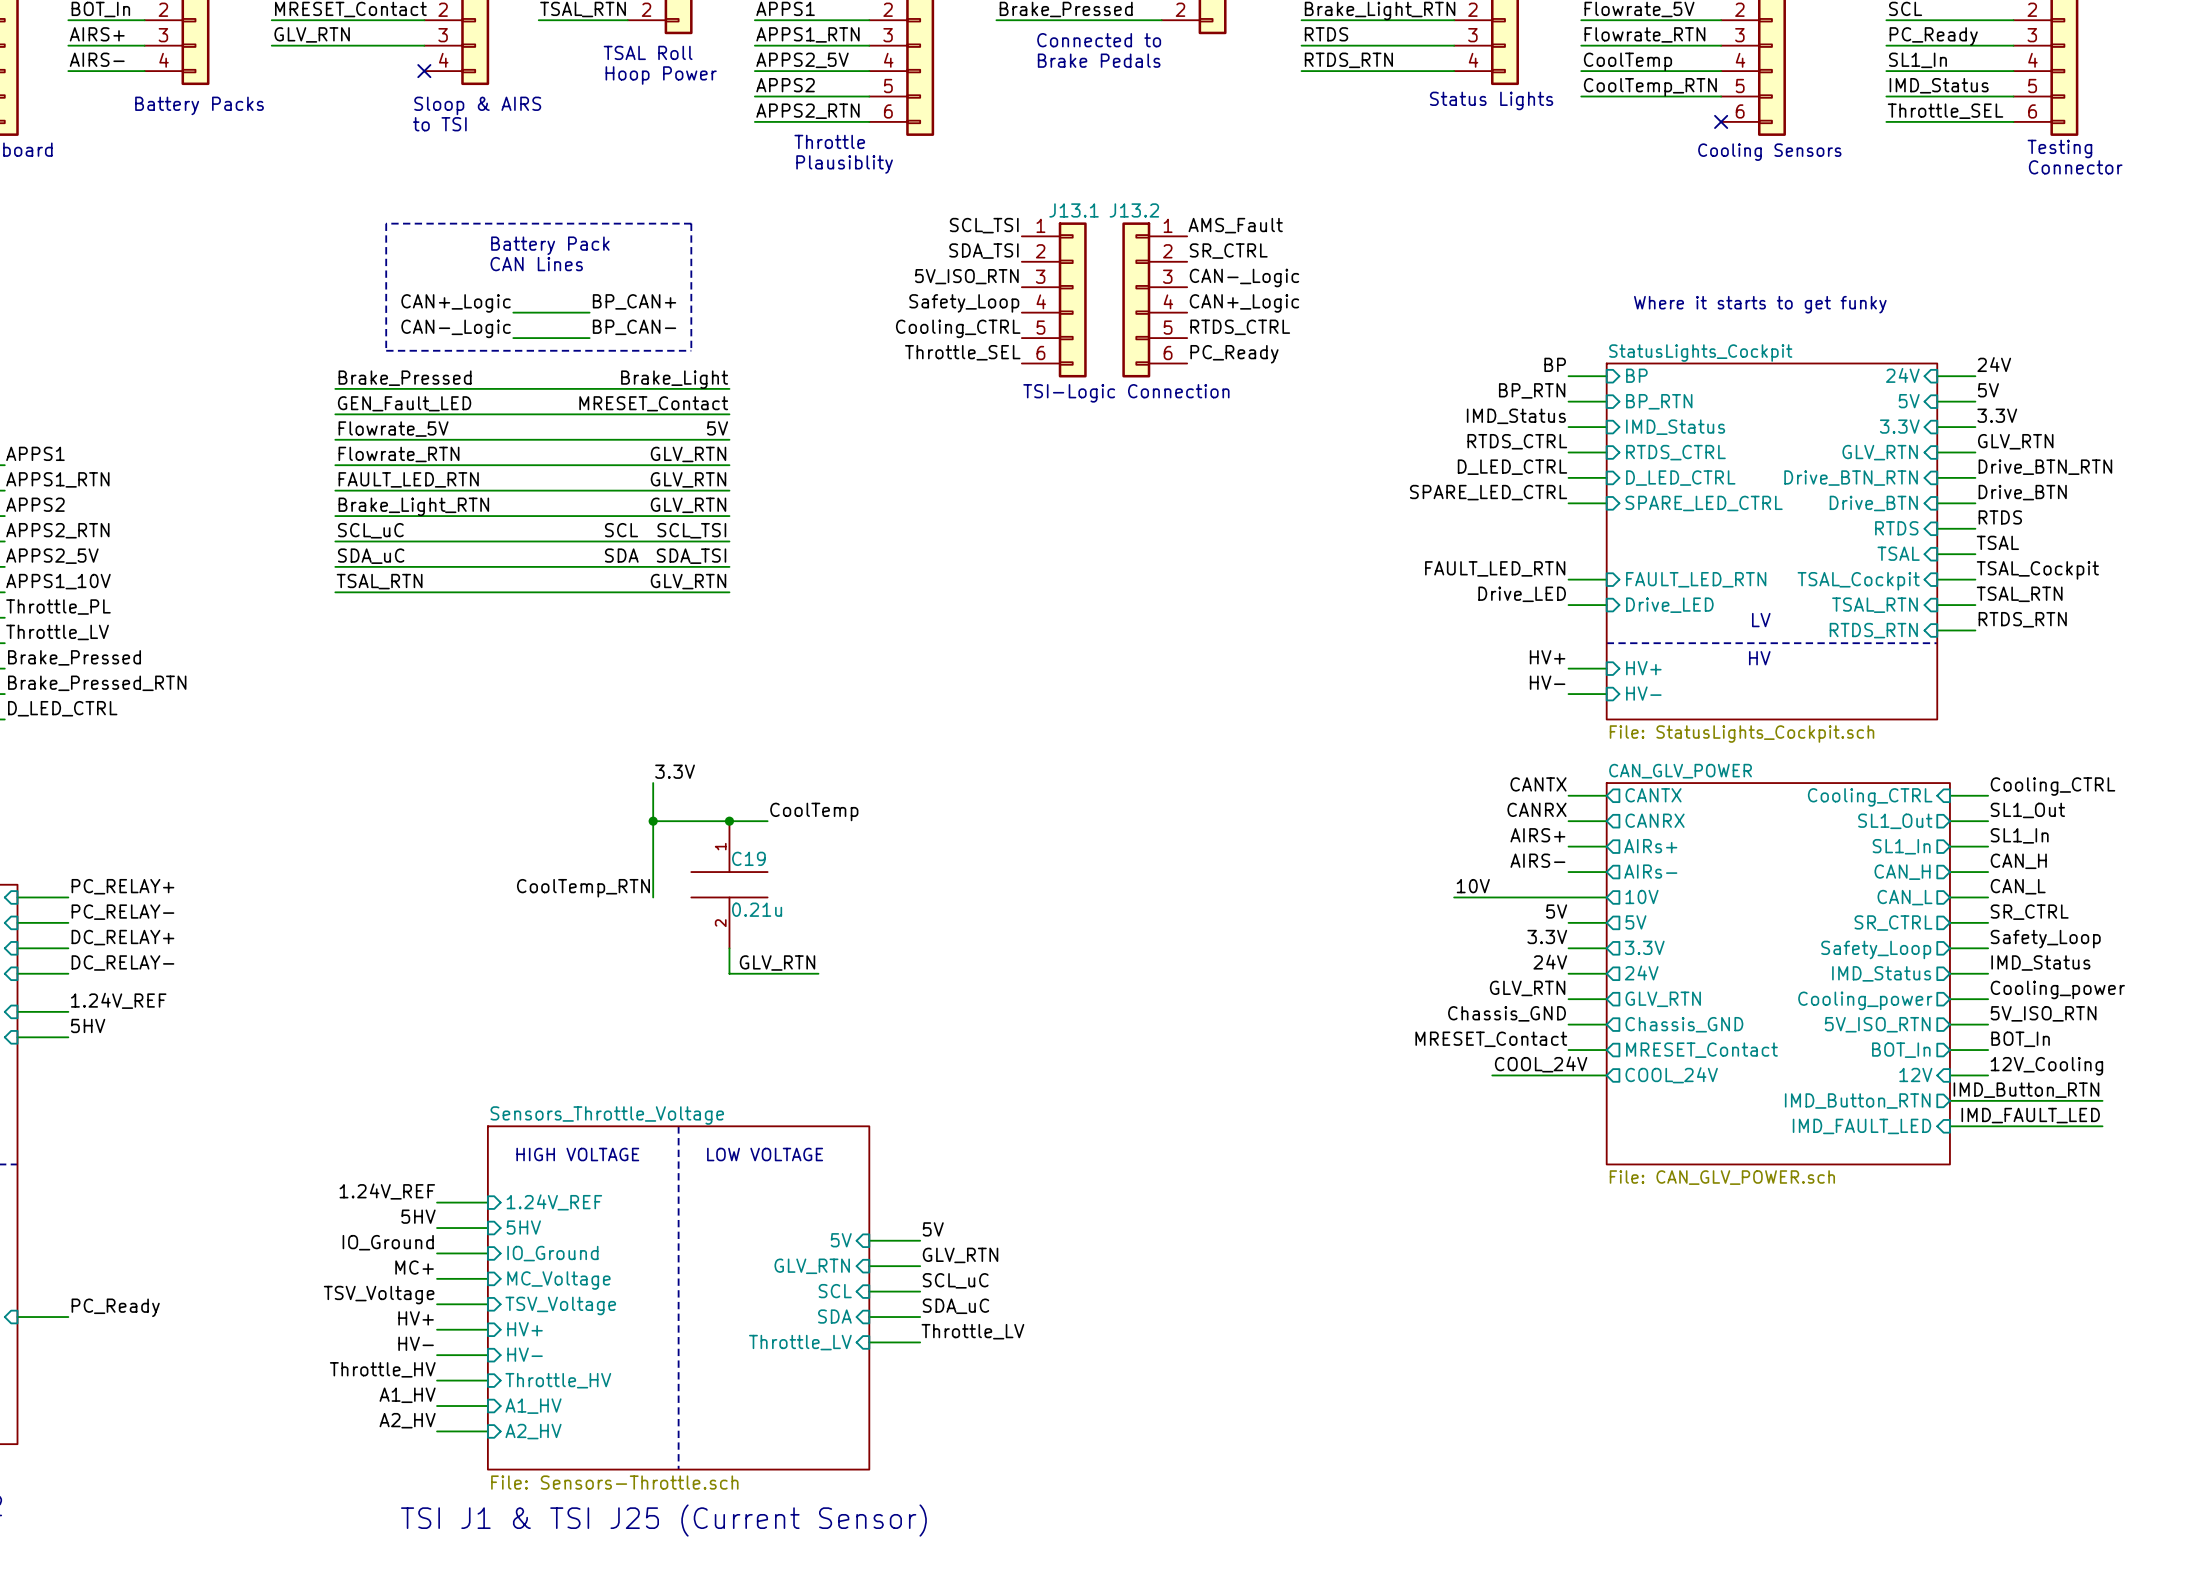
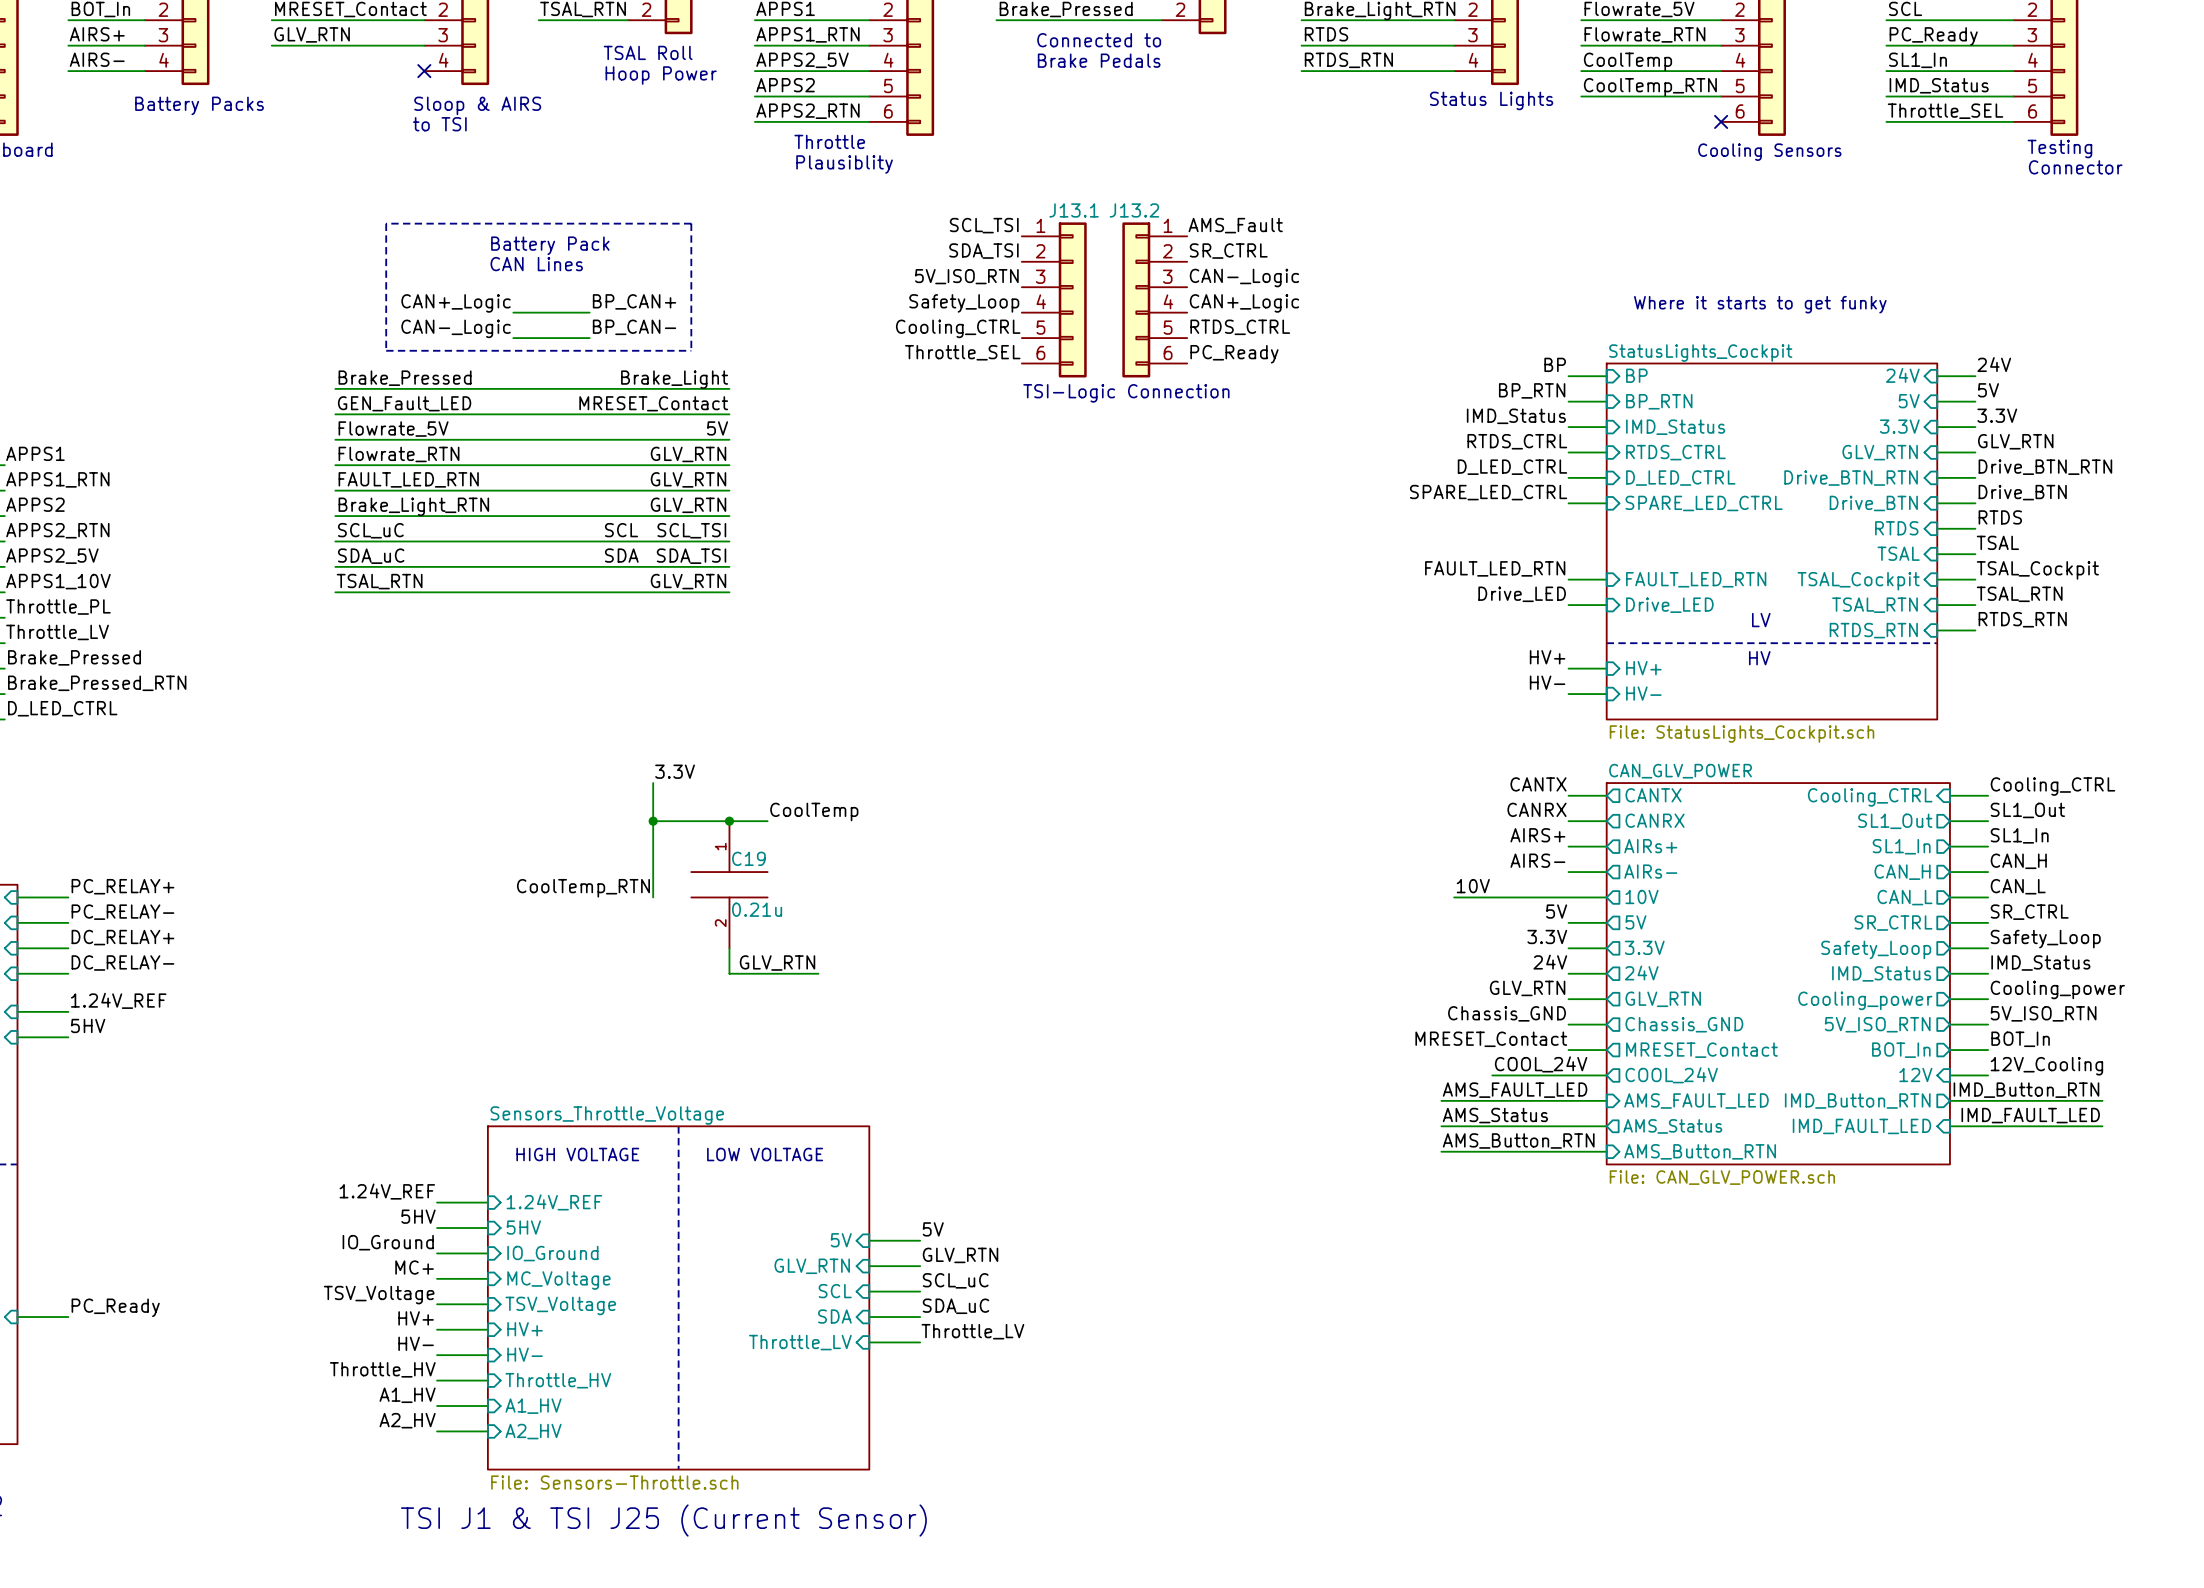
label: none -> AMS_FAULT_LED (1515, 1090)
wire: none -> (1441, 1100) (1606, 1100)
sheet pin: none -> AMS_FAULT_LED (1696, 1101)
label: none -> AMS_Status (1495, 1115)
wire: none -> (1441, 1126) (1606, 1126)
sheet pin: none -> AMS_Status (1672, 1126)
label: none -> AMS_Button_RTN (1518, 1141)
wire: none -> (1441, 1151) (1606, 1151)
sheet pin: none -> AMS_Button_RTN (1700, 1151)

